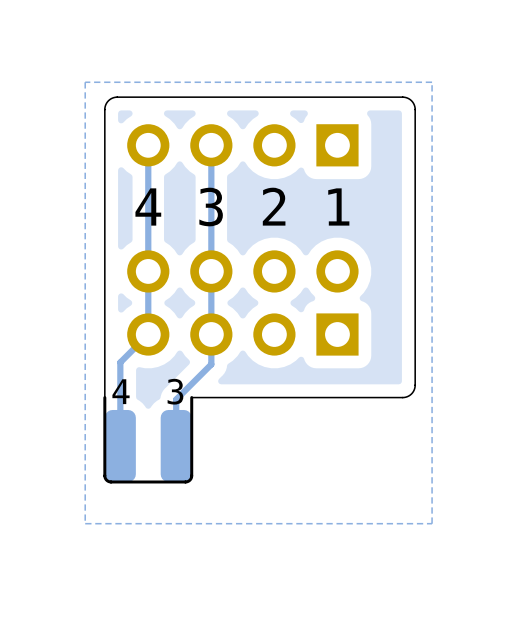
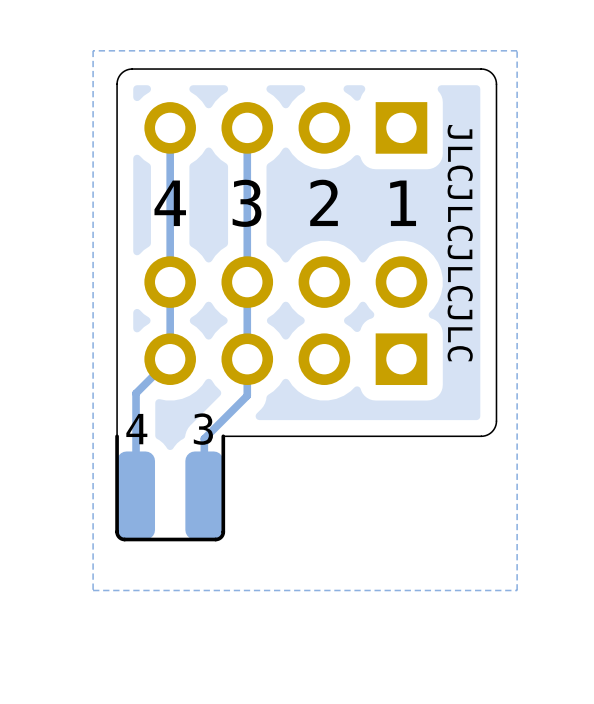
text: none -> JLCJLCJLCJLC (460, 243)

